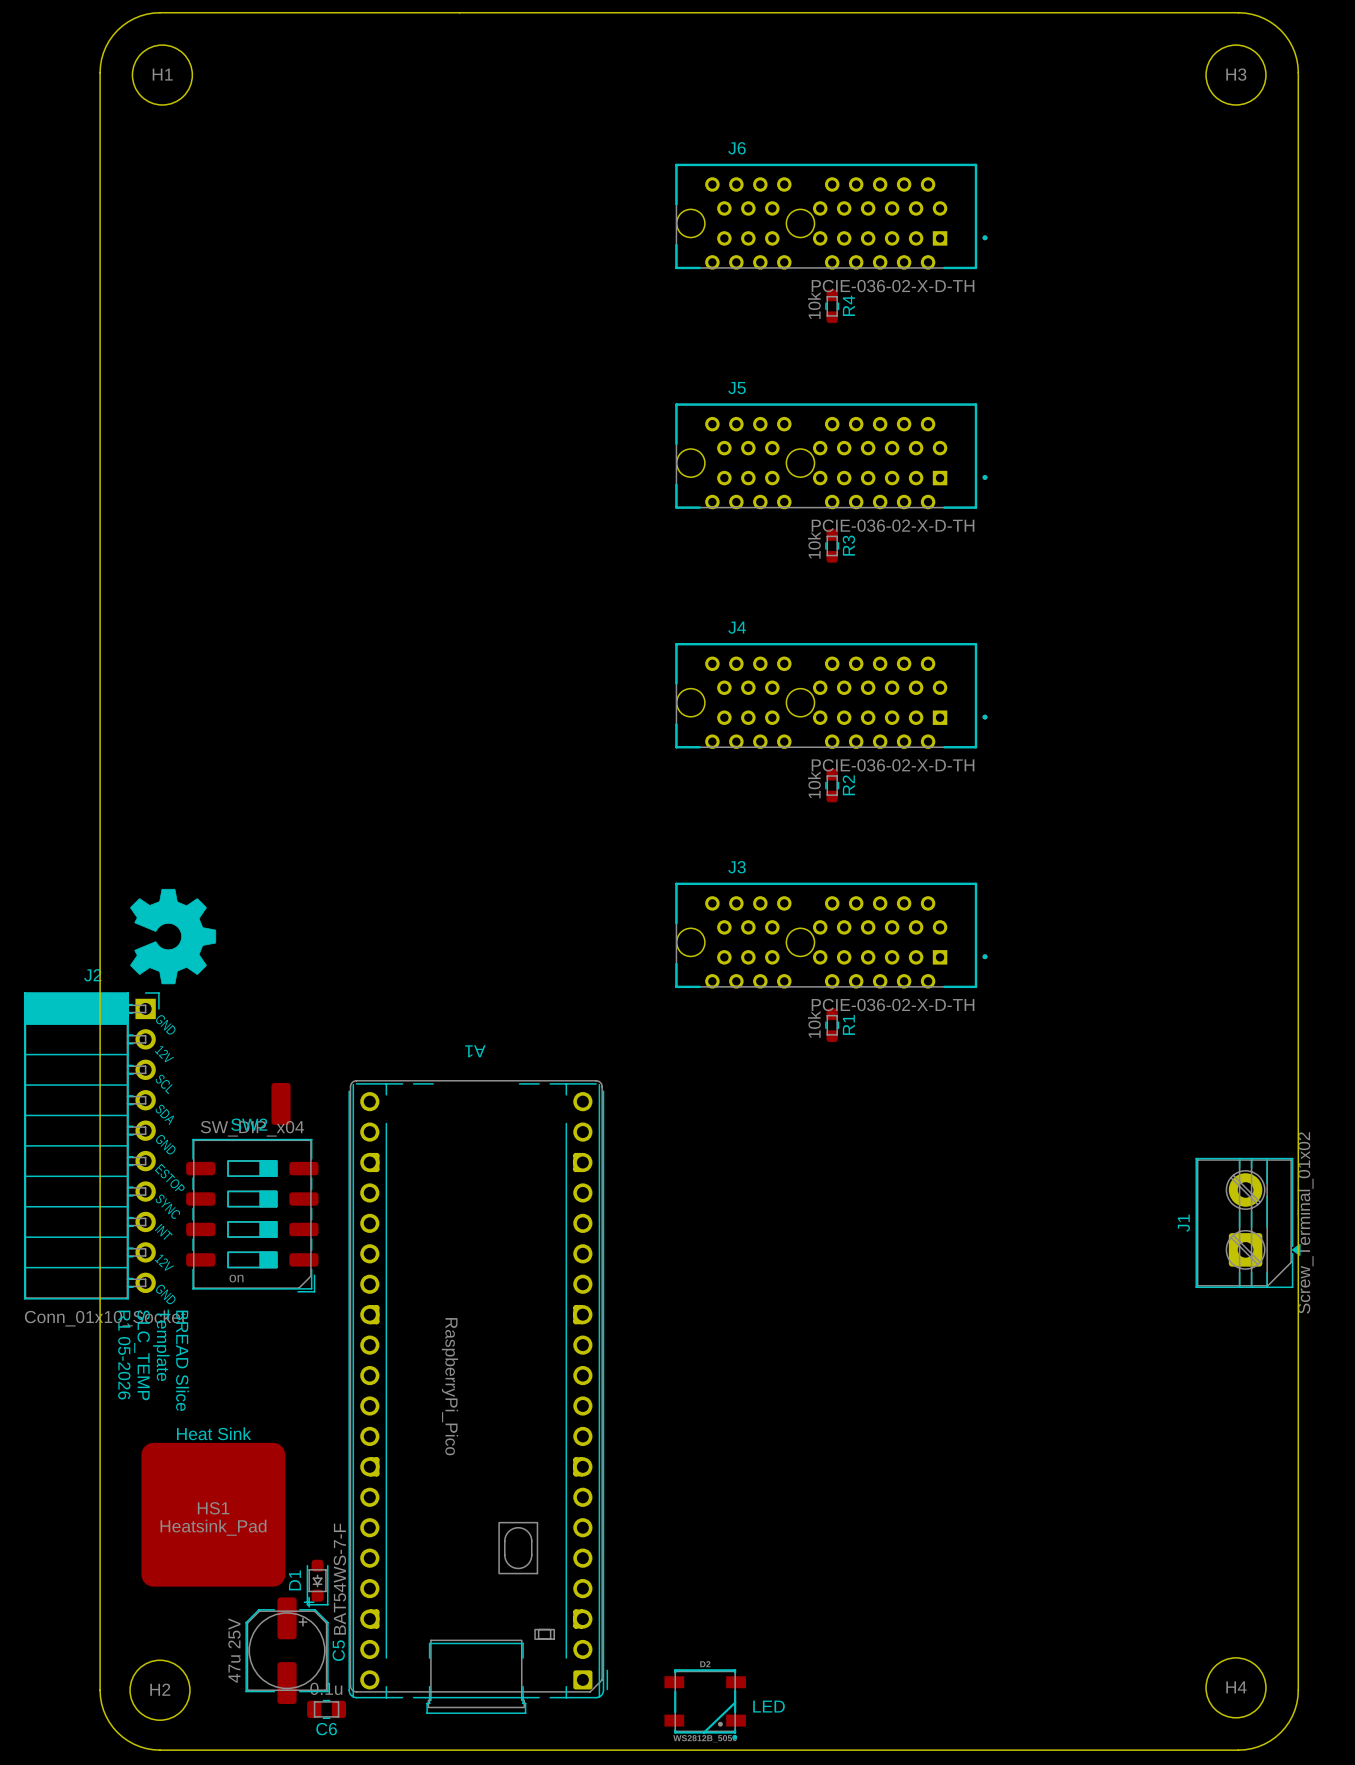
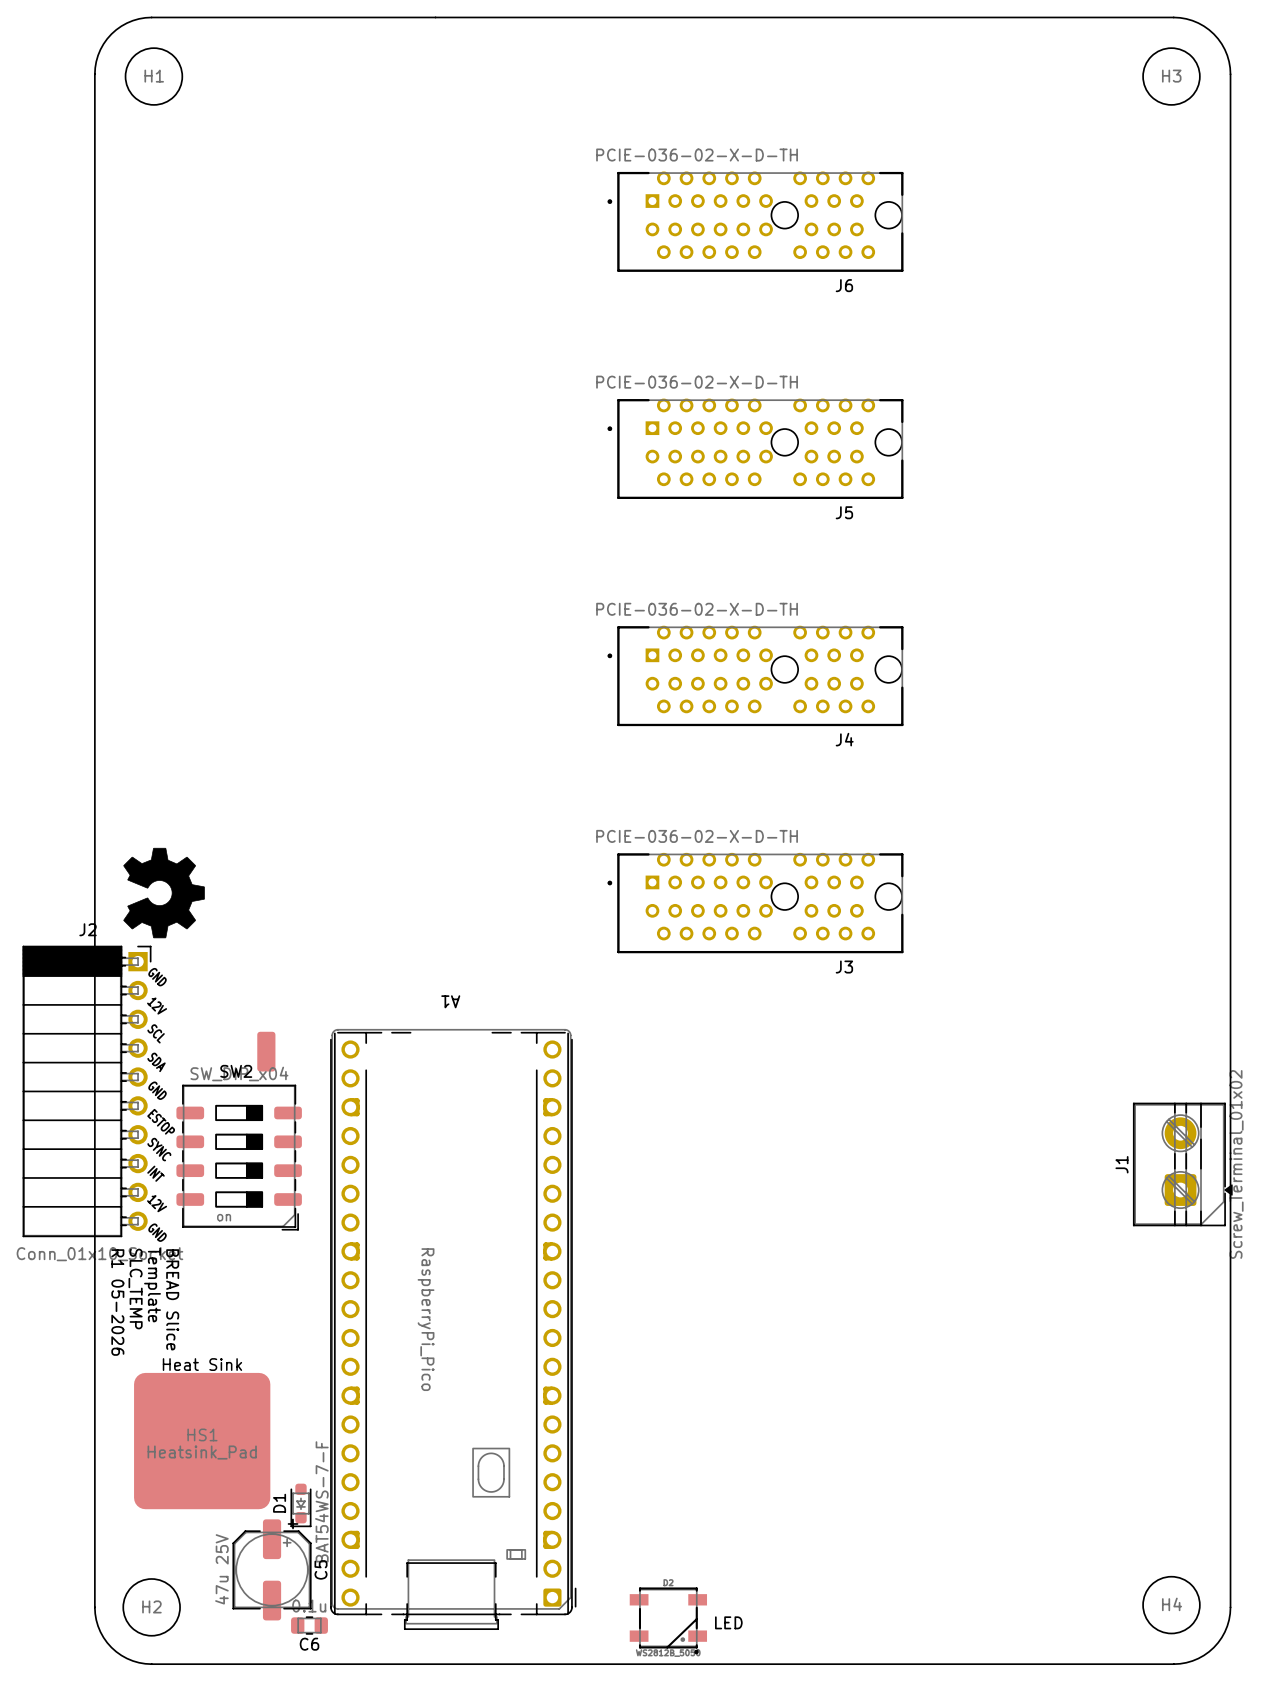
J6 rotation: 0° (831, 216) -> 180° (755, 221)
R4: 10k (832, 306) -> none
J5 rotation: 0° (831, 456) -> 180° (755, 448)
R3: 10k (832, 545) -> none
J4 rotation: 0° (831, 695) -> 180° (755, 675)
R2: 10k (832, 785) -> none
J3 rotation: 0° (831, 935) -> 180° (755, 903)
R1: 10k (832, 1025) -> none

